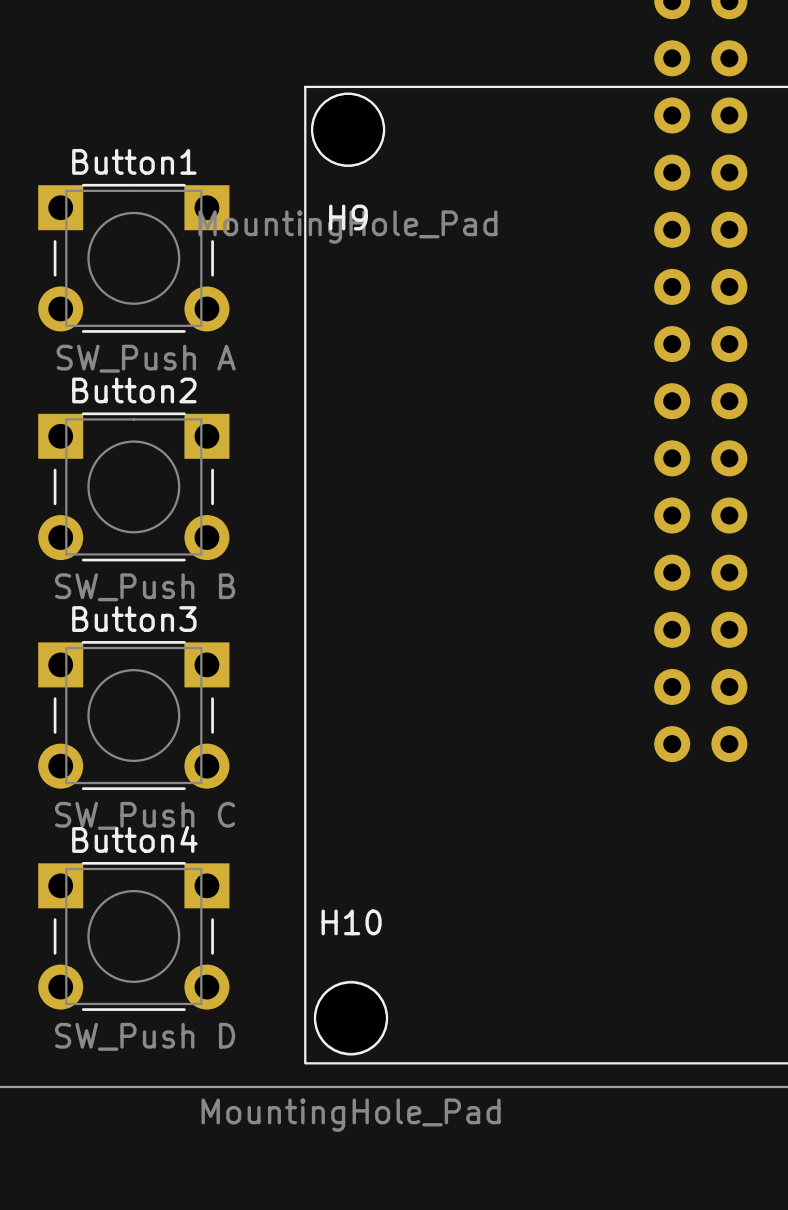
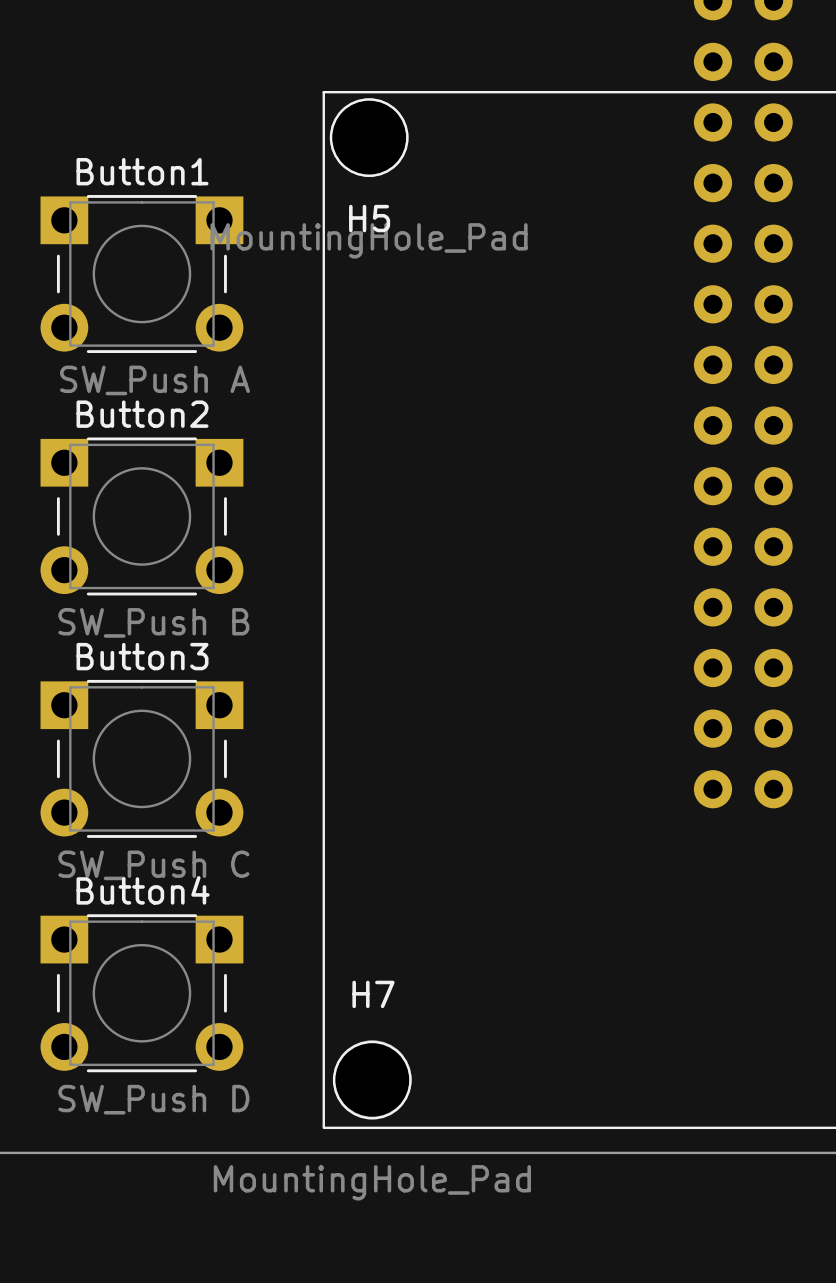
H9 name: H9 (348, 217) -> H5 (369, 218)
H10 name: H10 (351, 922) -> H7 (373, 994)

